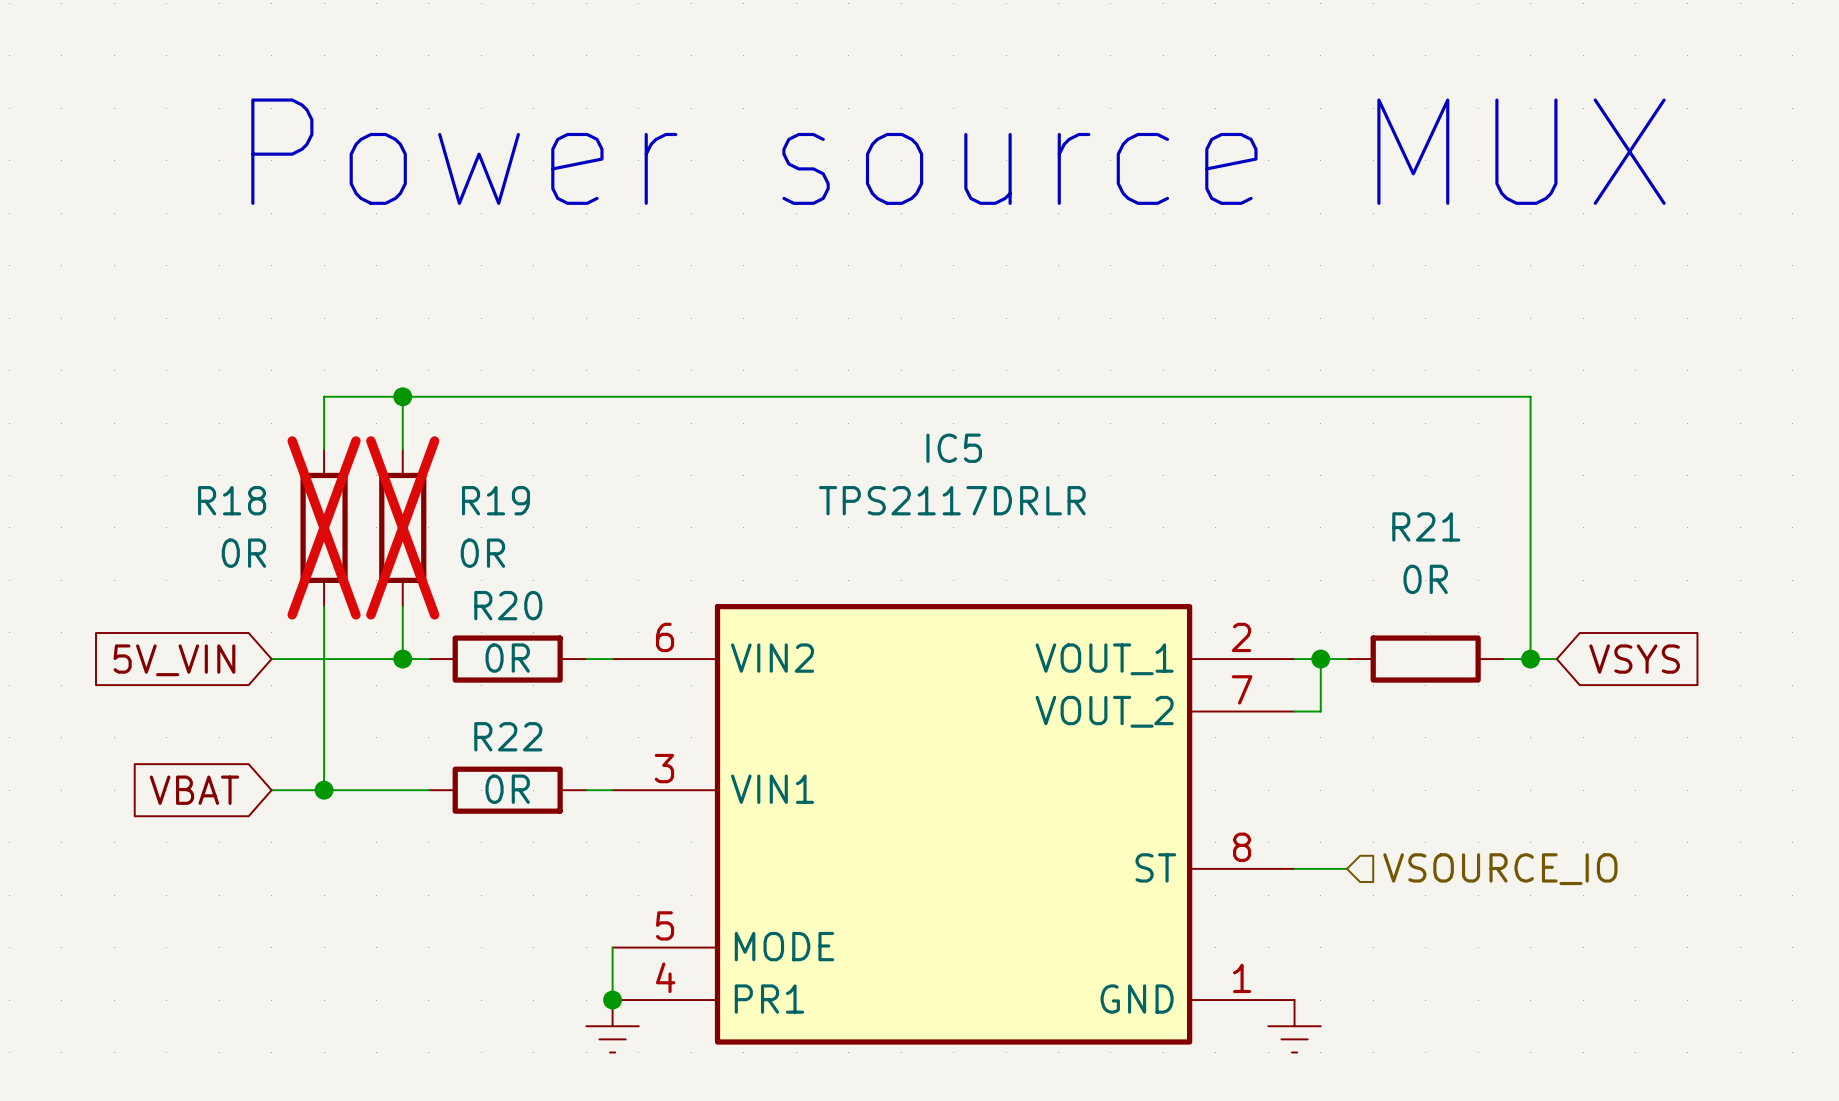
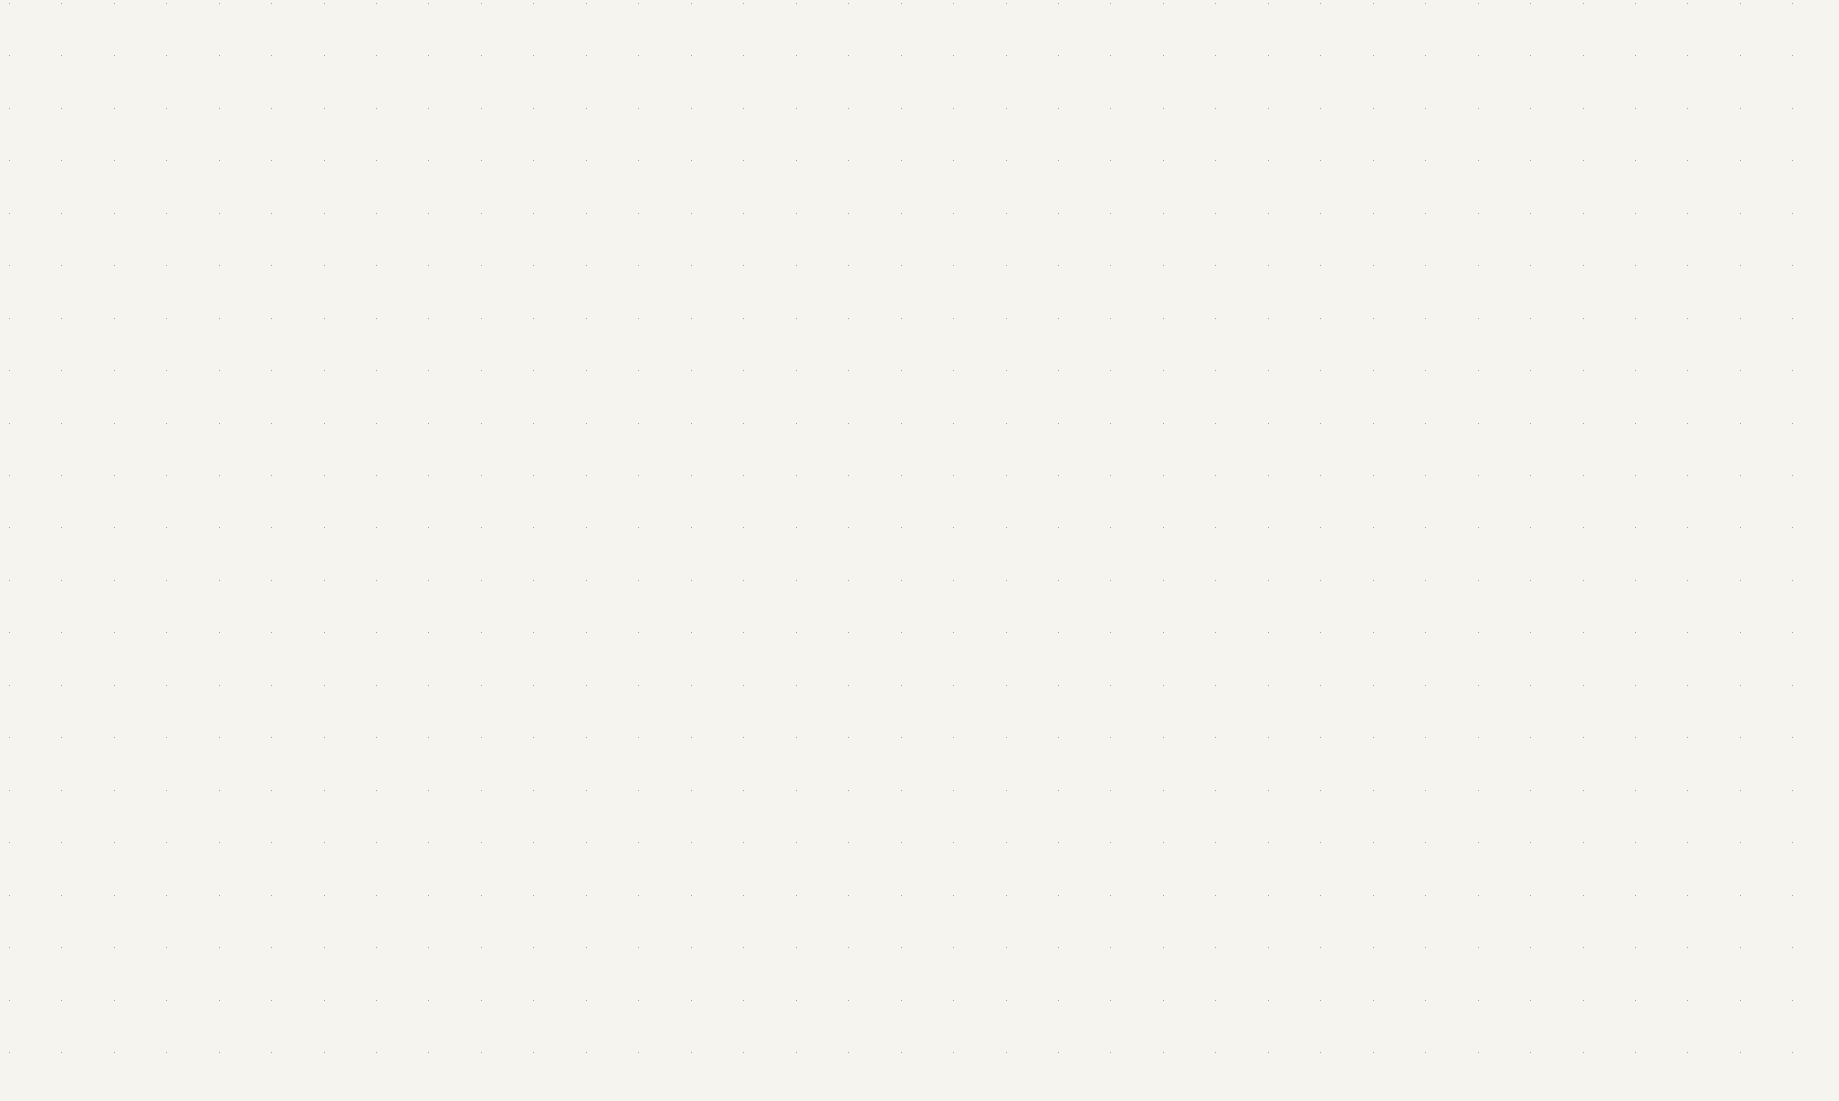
text: Power source MUX (958, 151) -> none
wire: (402, 396) (402, 449) -> none
junction: (402, 396) -> none
wire: (324, 449) (324, 396) (1530, 396) (1530, 659) -> none
R18: 0R (324, 527) -> none
R19: 0R (402, 527) -> none
wire: (324, 606) (324, 790) -> none
wire: (402, 606) (402, 659) -> none
wire: (271, 659) (428, 659) -> none
junction: (402, 659) -> none
R20: 0R (507, 659) -> none
wire: (586, 659) (612, 659) -> none
wire: (1294, 659) (1346, 659) -> none
wire: (1320, 659) (1320, 711) (1294, 711) -> none
junction: (1320, 659) -> none
R21: 0R (1425, 659) -> none
wire: (1504, 659) (1556, 659) -> none
junction: (1530, 659) -> none
global label: VSYS (1634, 659) -> none
global label: 5V_VIN (174, 660) -> none
global label: VBAT (194, 790) -> none
wire: (271, 790) (428, 790) -> none
junction: (324, 790) -> none
R22: 0R (507, 790) -> none
wire: (586, 790) (612, 790) -> none
IC5: TPS2117DRLR (953, 824) -> none
wire: (1294, 868) (1346, 868) -> none
hierarchical label: VSOURCE_IO (1500, 869) -> none
wire: (612, 947) (612, 1000) -> none
junction: (612, 1000) -> none
power symbol: (612, 1026) -> none
power symbol: (1294, 1026) -> none

